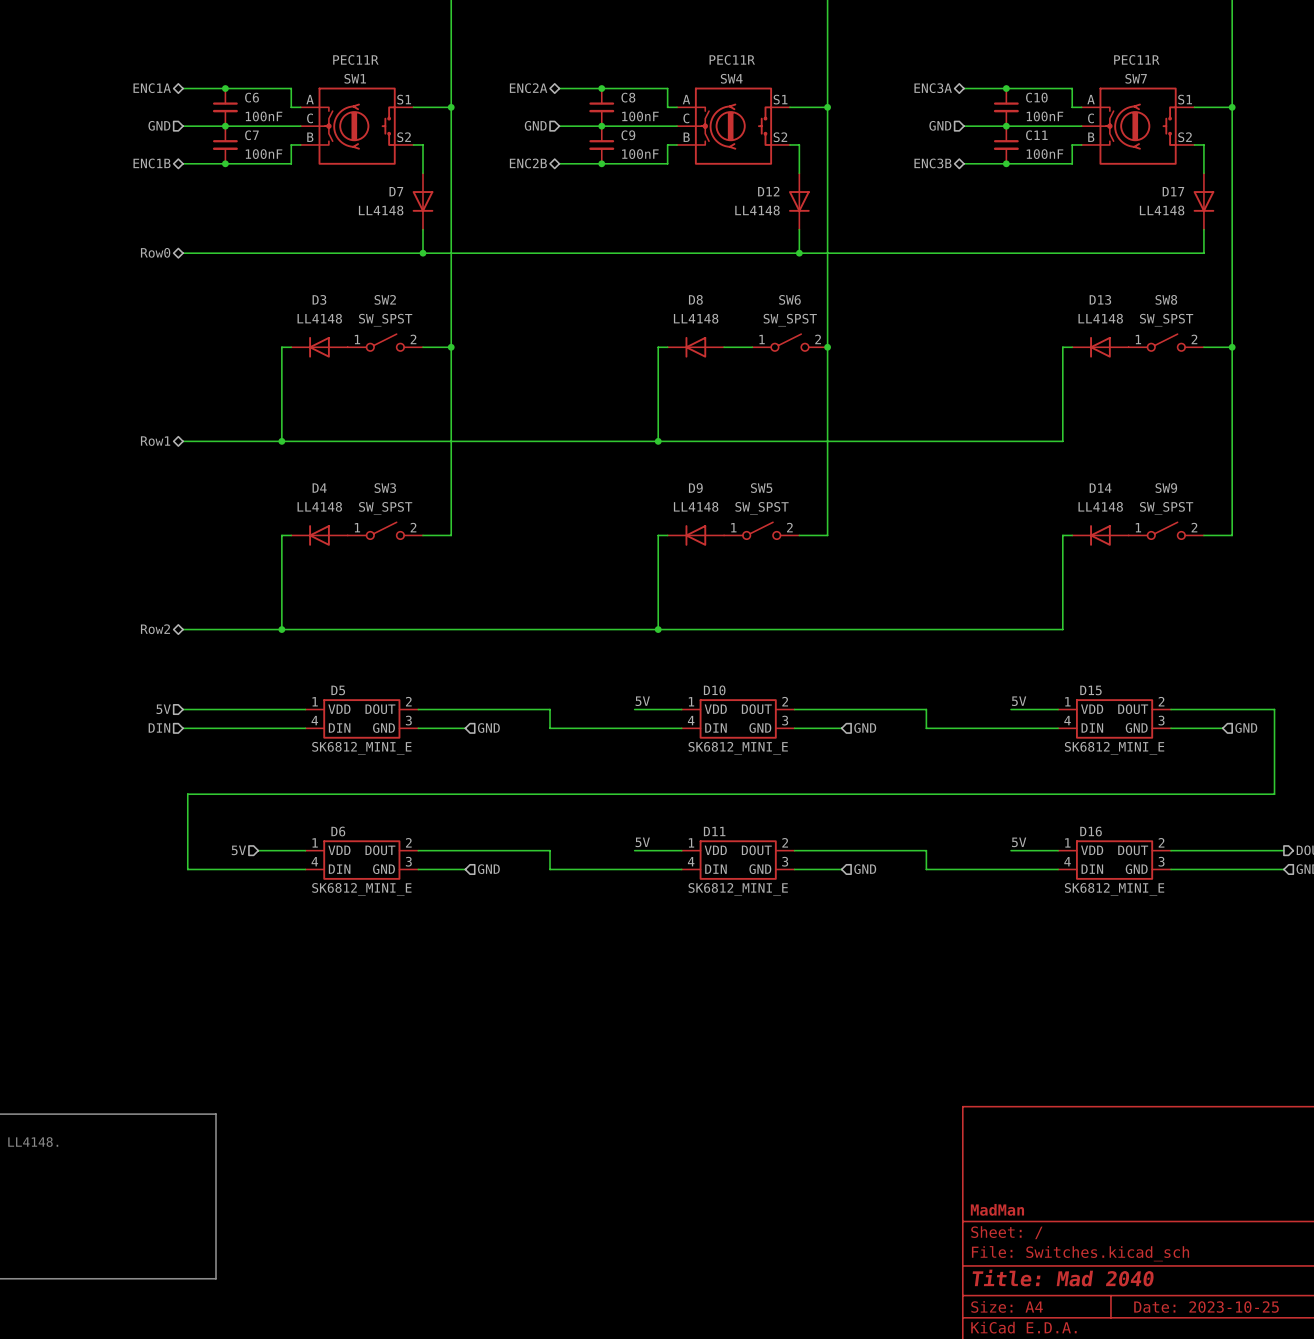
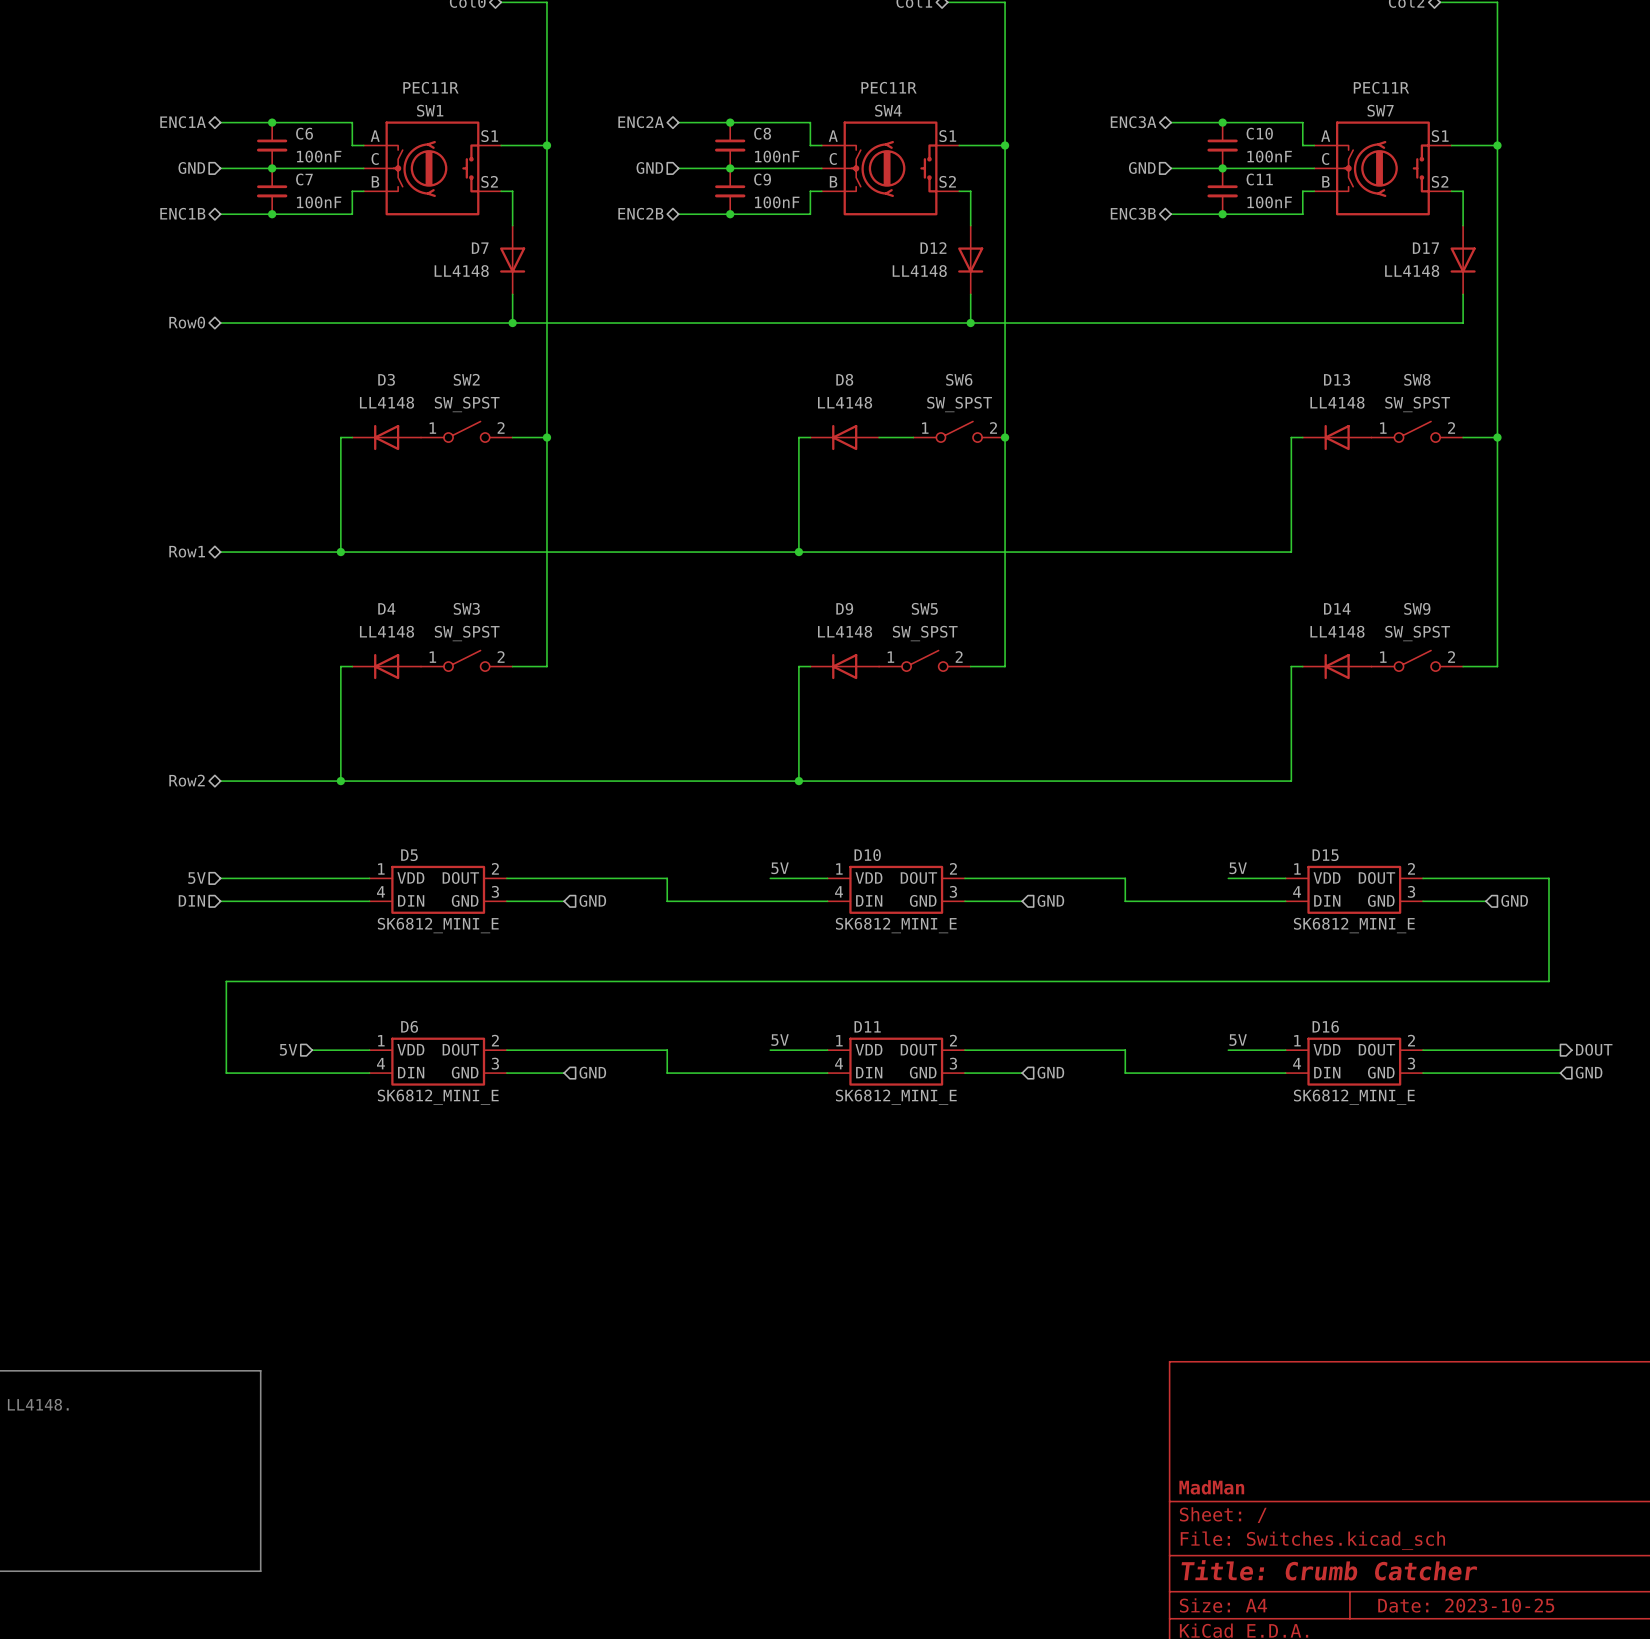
title block: Title: Mad 2040 (1063, 1278) -> Title: Crumb Catcher (1329, 1570)

